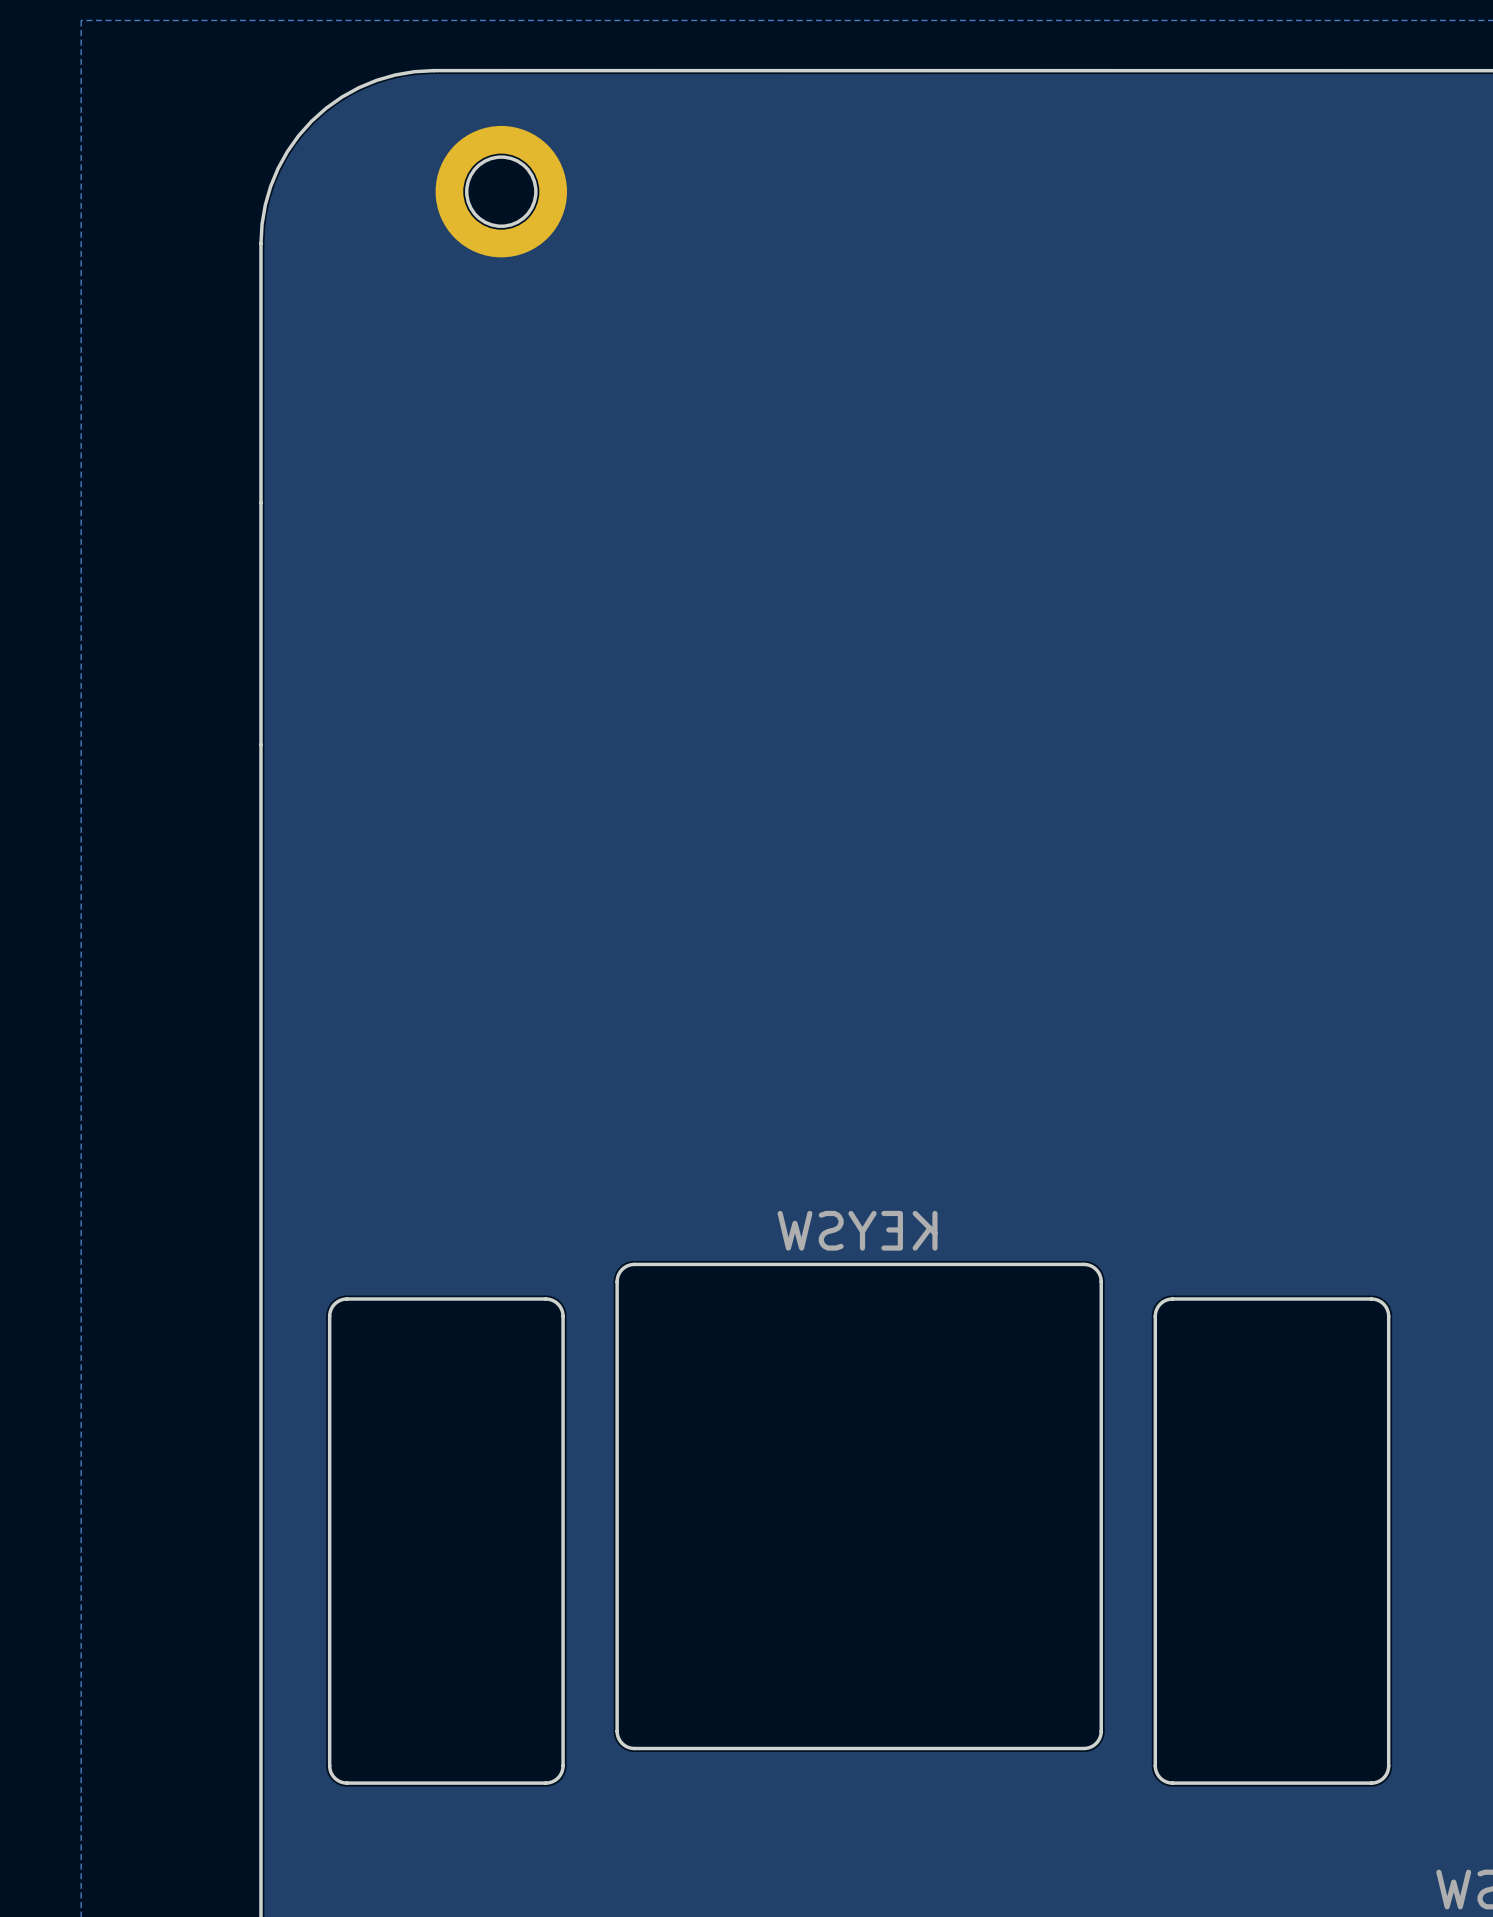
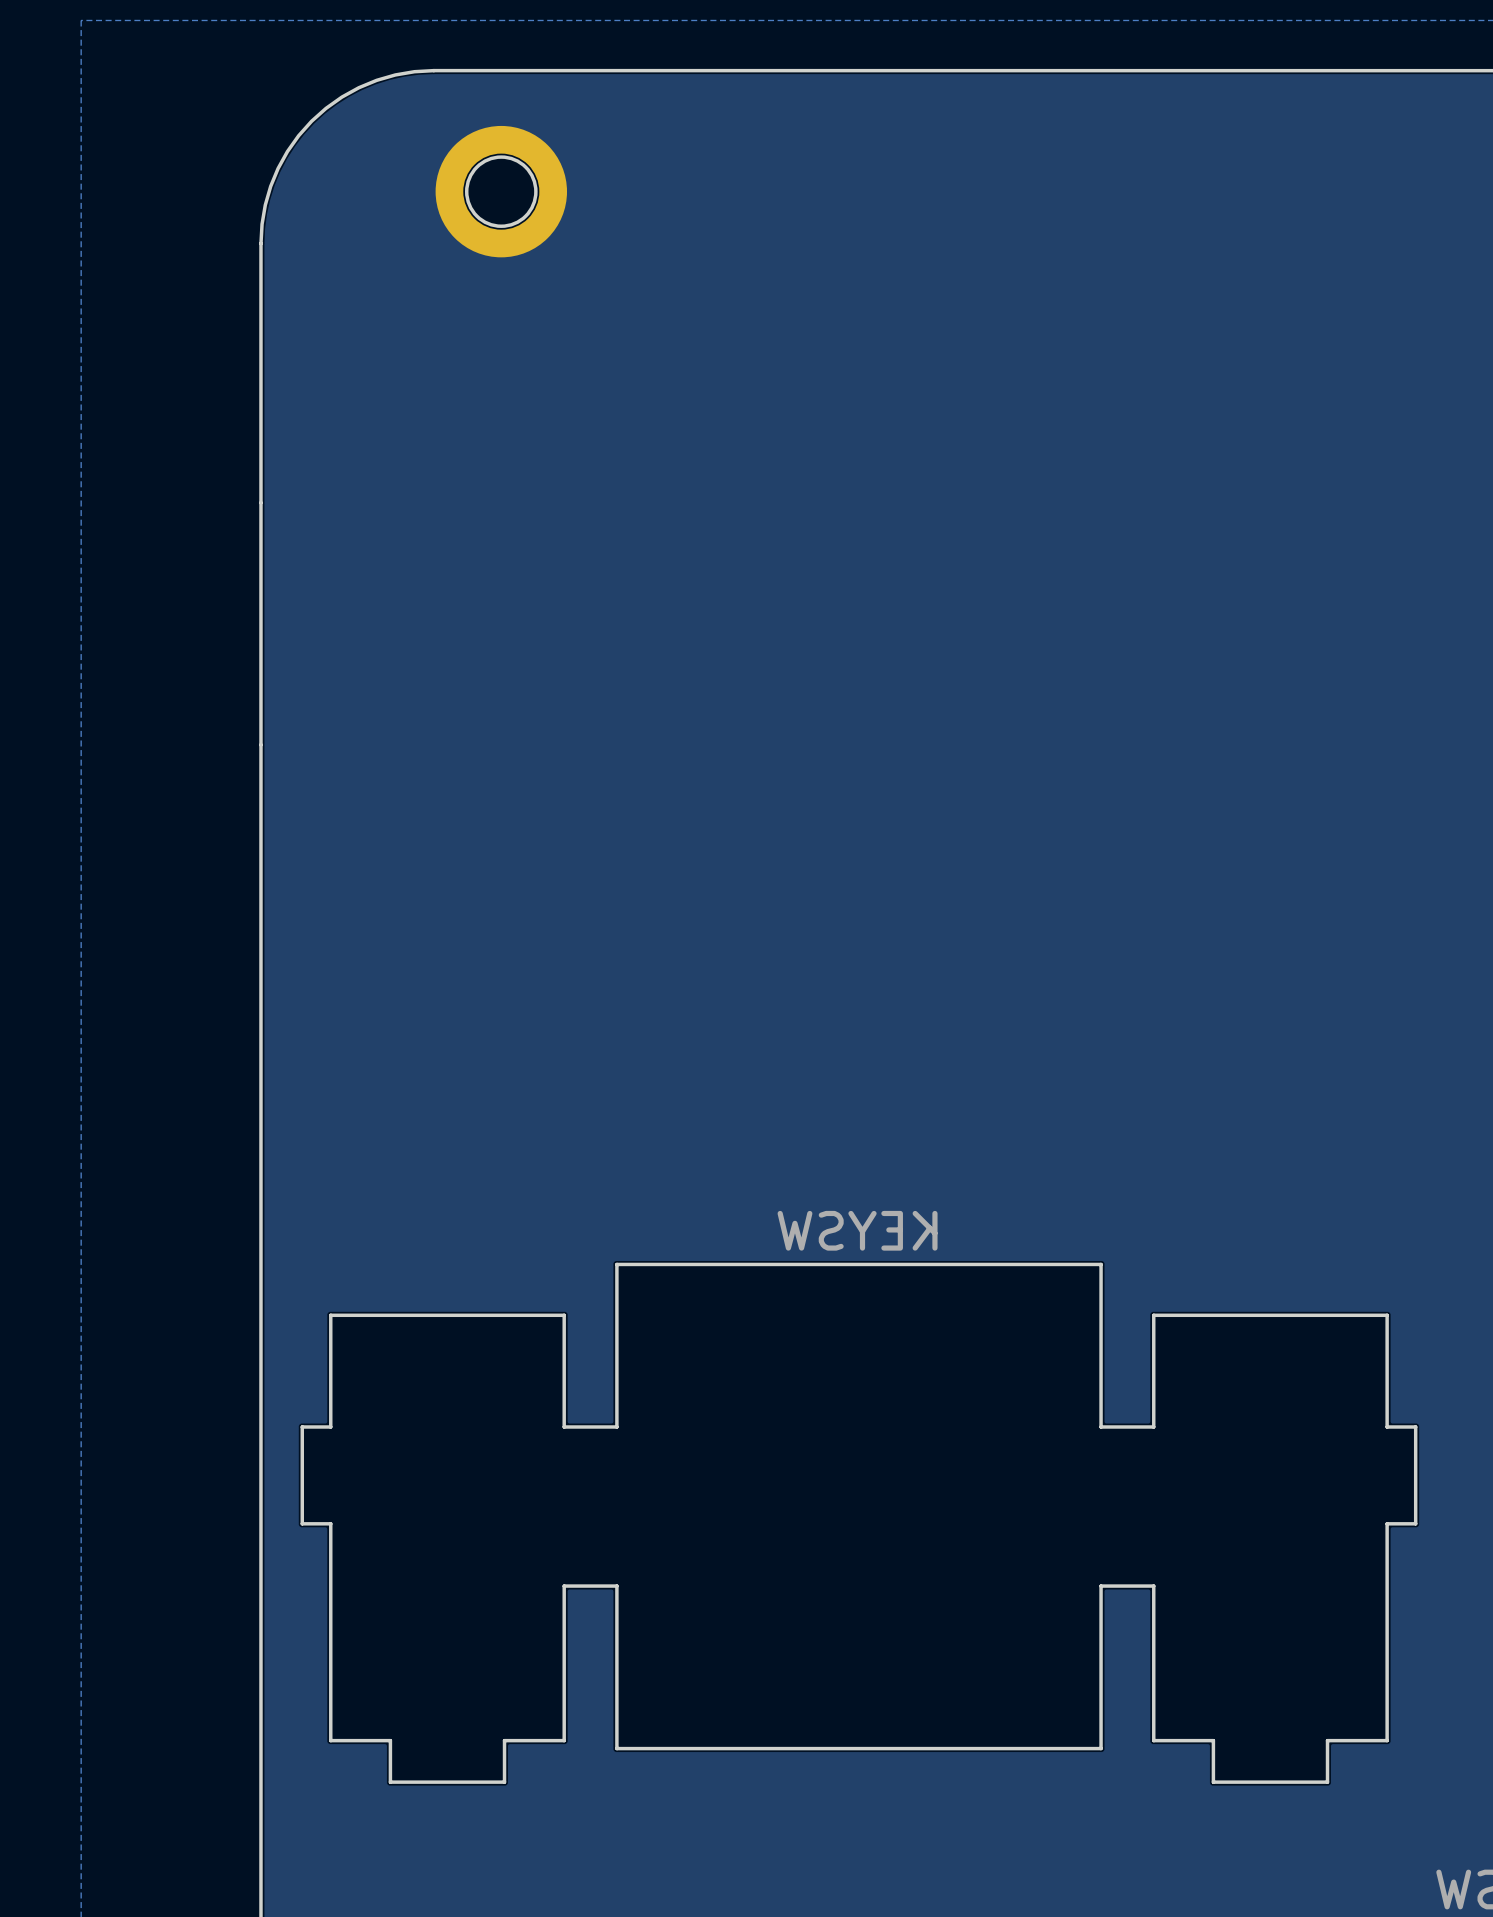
board edge: (1083, 1264) (1096, 1269) (1101, 1281) (1101, 1731) (1096, 1743) (1083, 1748) (634, 1748) (622, 1743) (617, 1731) (617, 1281) (622, 1269) (634, 1264) -> (1083, 1264) (1101, 1264) (1101, 1426) (1153, 1426) (1153, 1315) (1387, 1315) (1387, 1426) (1415, 1426) (1415, 1523) (1387, 1523) (1387, 1740) (1327, 1740) (1327, 1782) (1213, 1782) (1213, 1740) (1153, 1740) (1153, 1586) (1101, 1586) (1101, 1748) (616, 1748) (616, 1586) (564, 1586) (564, 1740) (504, 1740) (504, 1782) (390, 1782) (390, 1740) (330, 1740) (330, 1523) (302, 1523) (302, 1426) (330, 1426) (330, 1315) (564, 1315) (564, 1426) (616, 1426) (616, 1264) (634, 1264)
board edge: (545, 1298) (346, 1298) (338, 1301) (330, 1309) (329, 1765) (331, 1774) (340, 1781) (545, 1783) (554, 1780) (561, 1772) (563, 1316) (558, 1304) (545, 1298) -> none
board edge: (1371, 1298) (1172, 1298) (1163, 1301) (1156, 1309) (1155, 1765) (1158, 1776) (1165, 1781) (1371, 1783) (1381, 1779) (1387, 1772) (1388, 1316) (1383, 1304) (1371, 1298) -> none

